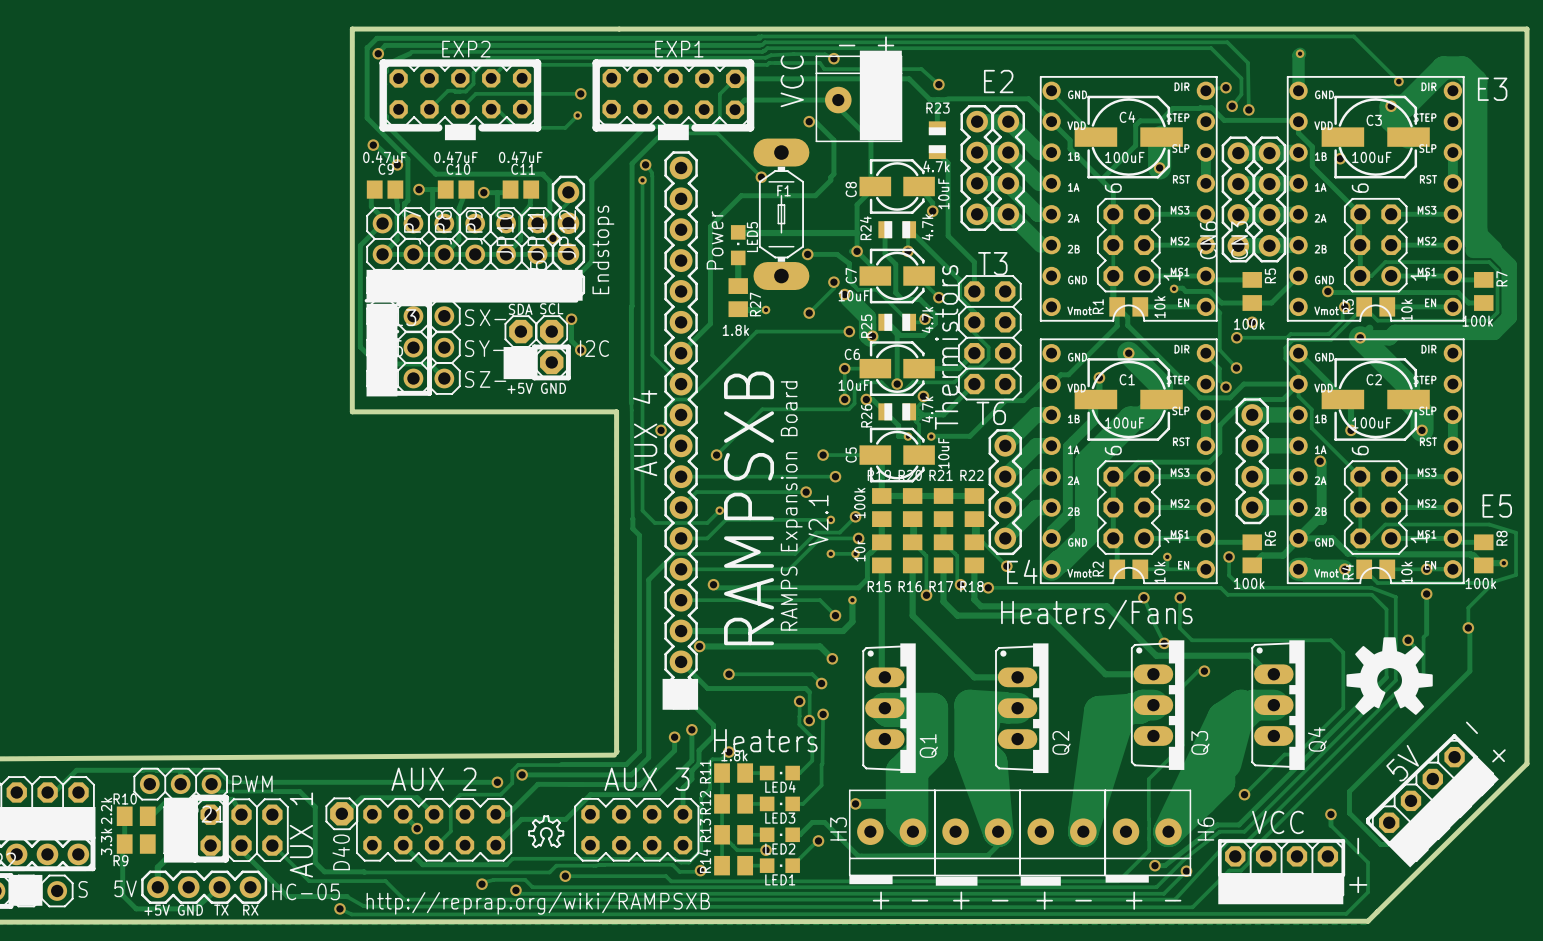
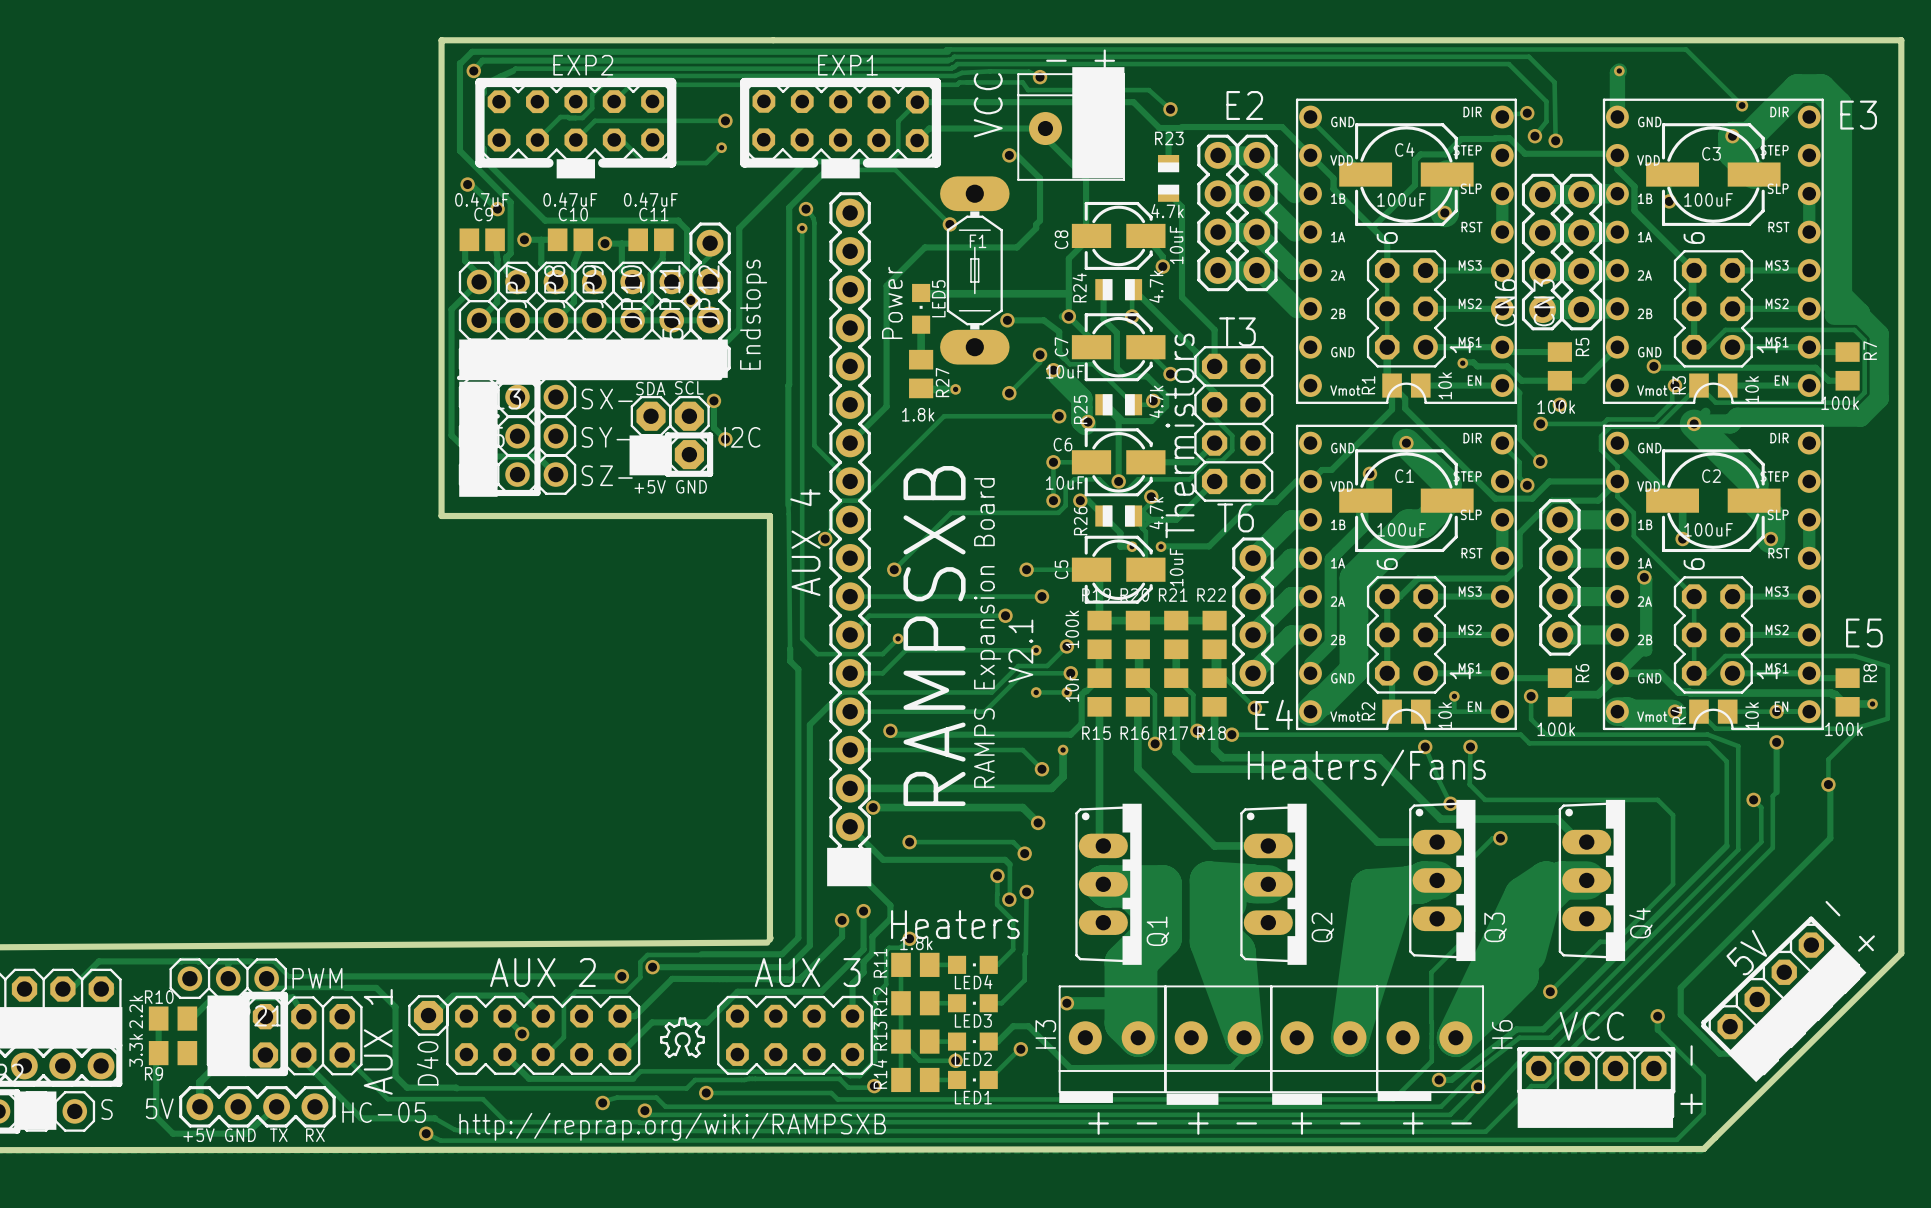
drawing: [1346, 637, 1433, 715] -> none

